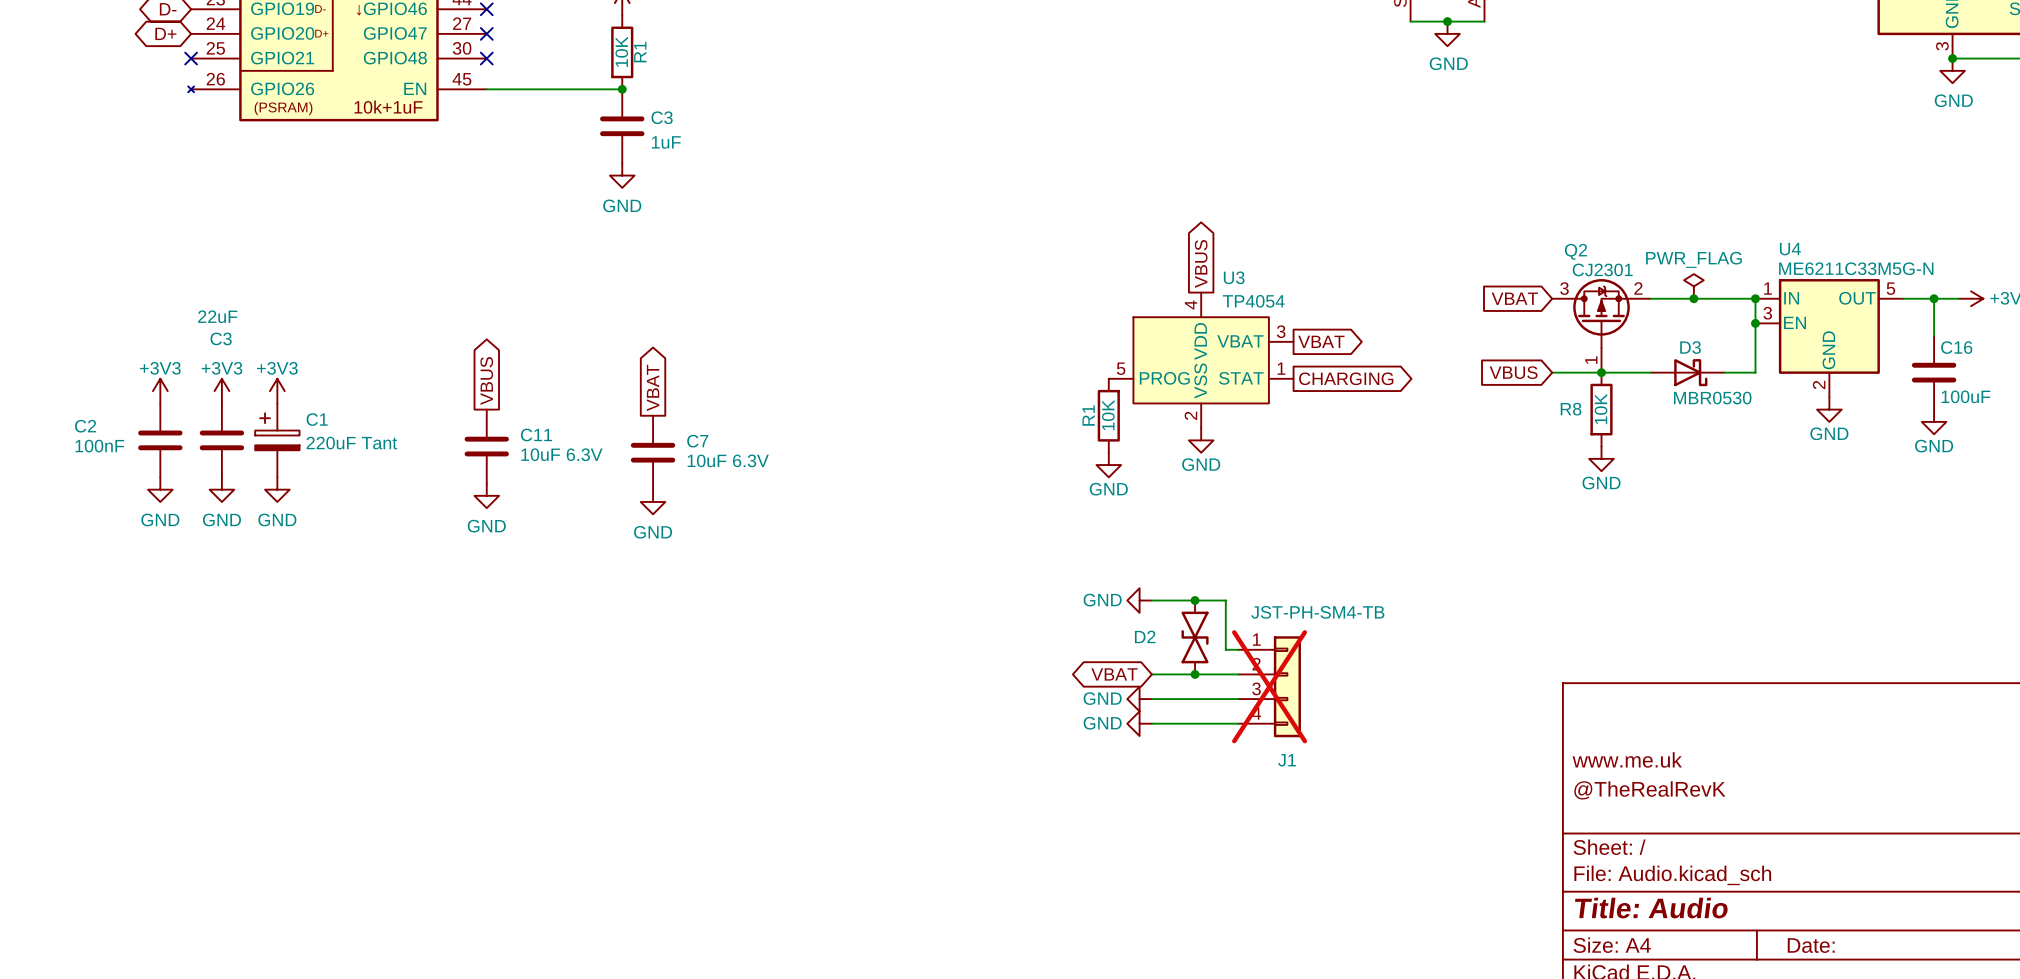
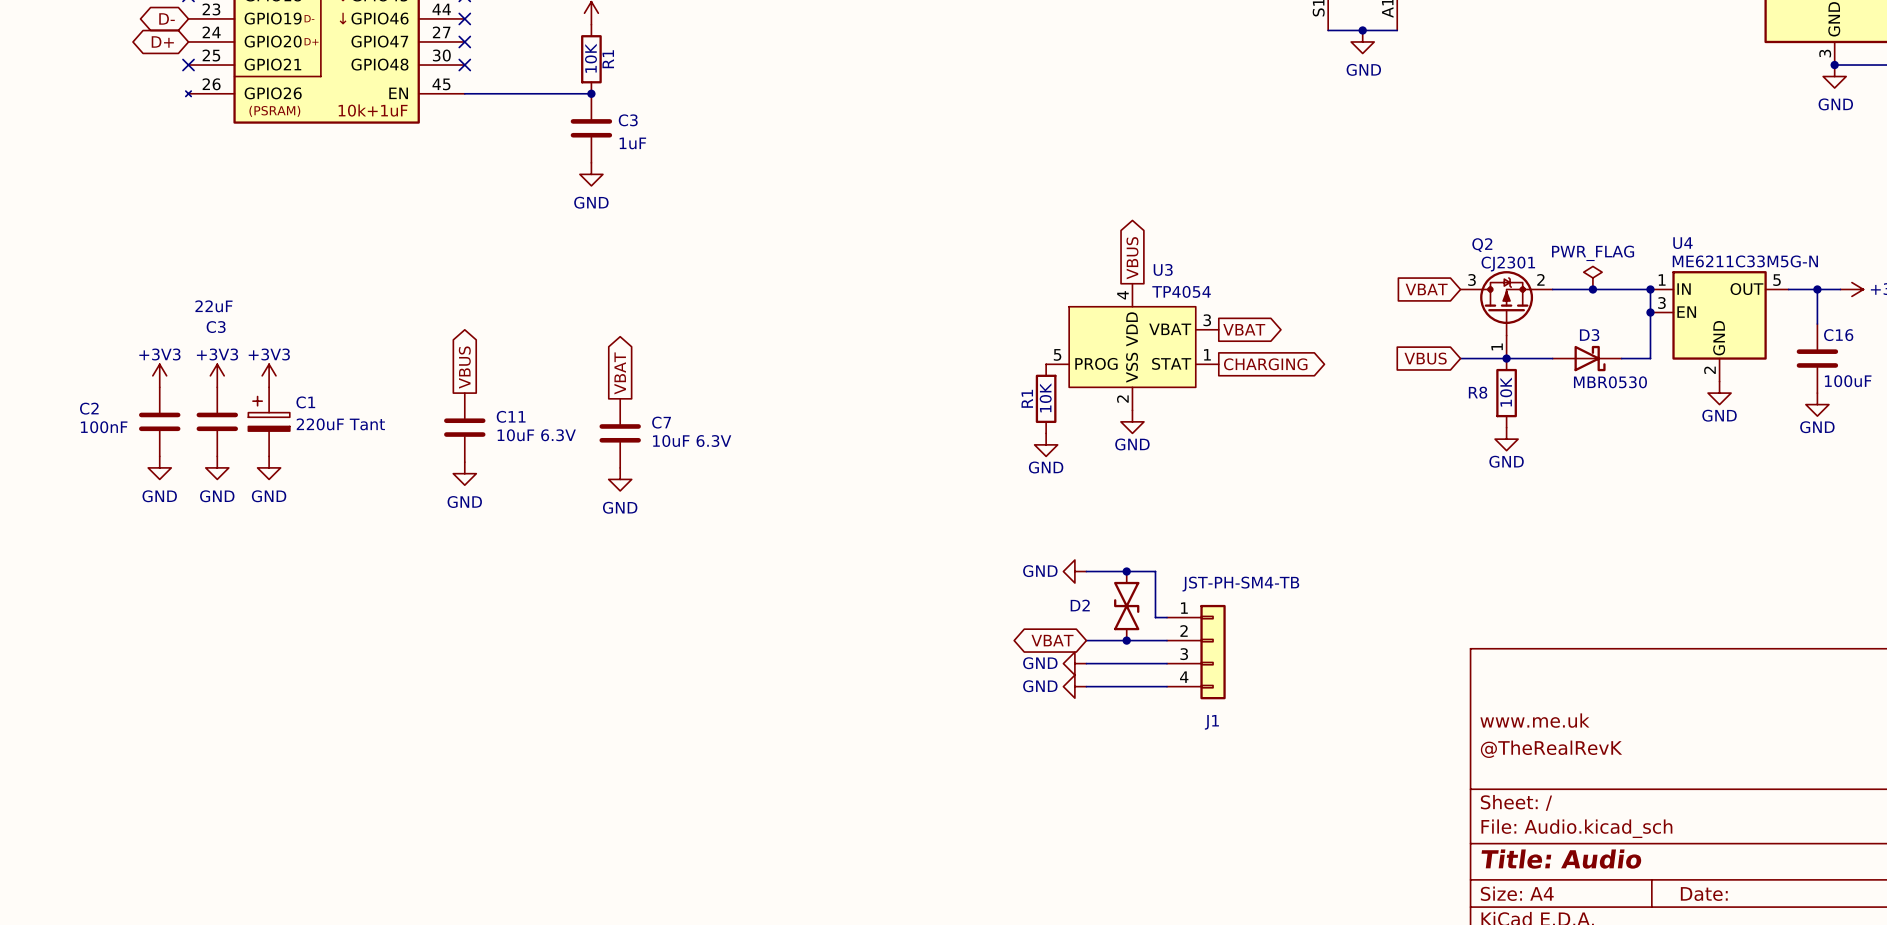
J1 do-not-place cross: (1269, 686) -> none

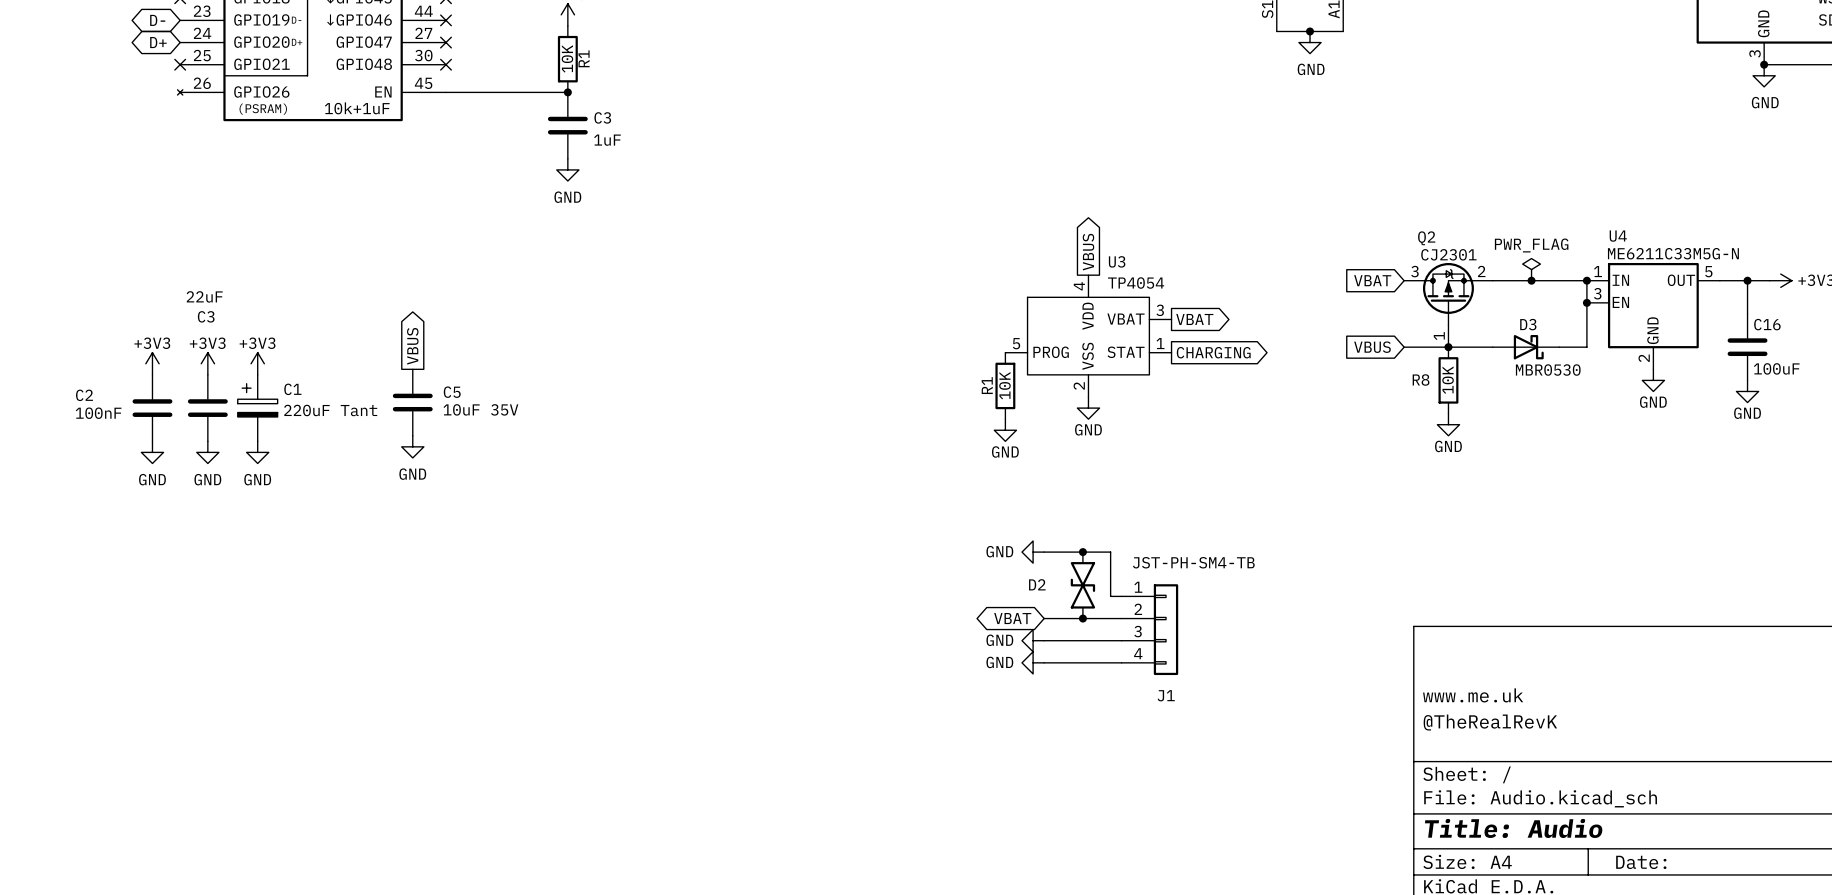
global label position: VBUS (464, 367) -> VBUS (412, 346)
global label: VBAT (620, 373) -> none
C5: none -> 10uF 35V (412, 402)
C11: 10uF 6.3V (464, 427) -> none
C7: 10uF 6.3V (620, 433) -> none
power symbol position: GND (464, 473) -> GND (412, 446)
power symbol: GND (620, 479) -> none

